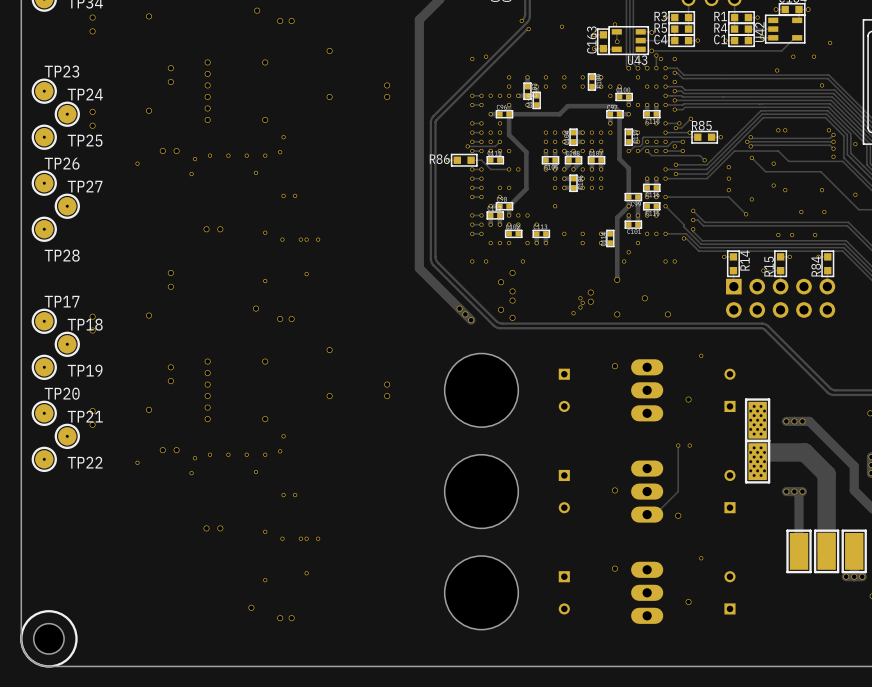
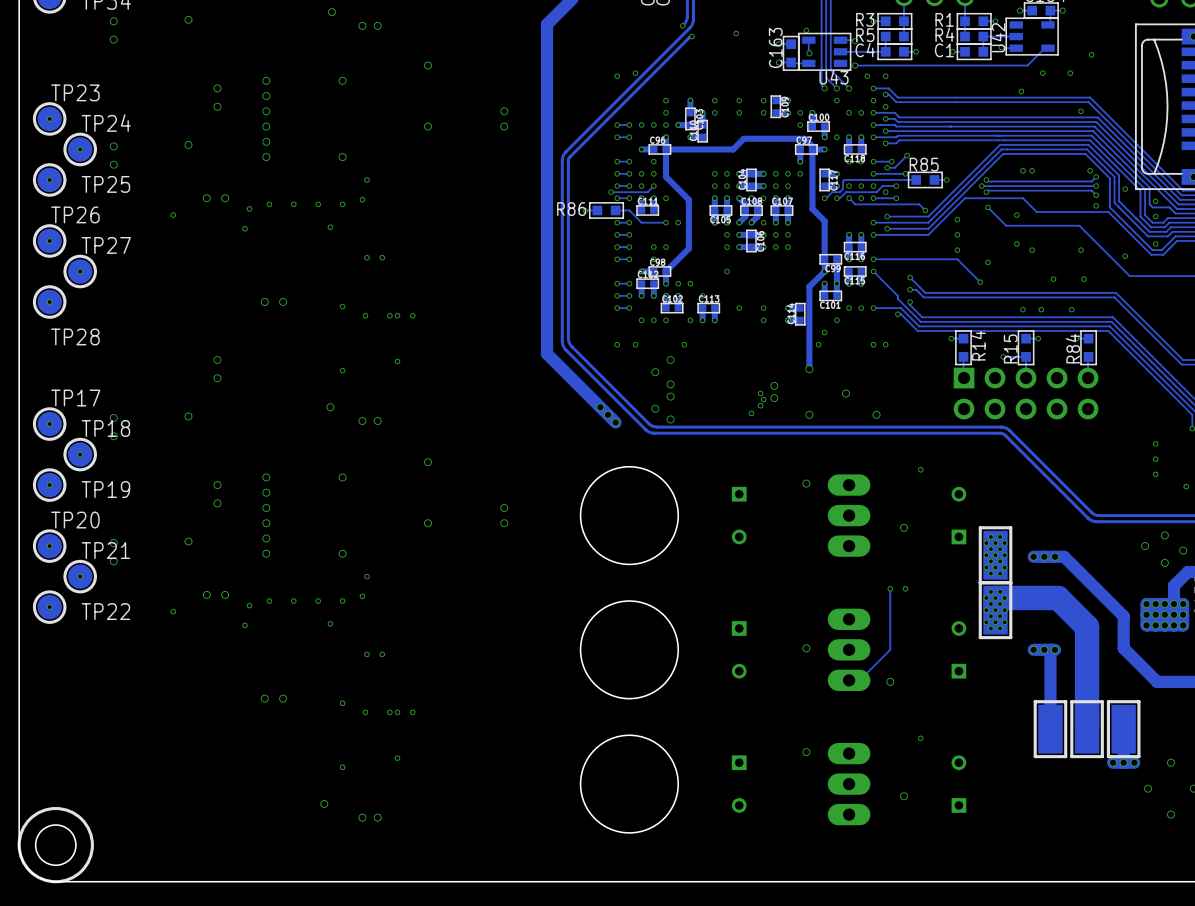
track: (656, 55) (656, 68) -> none
via: (656, 55) -> none
via: (656, 68) -> none

